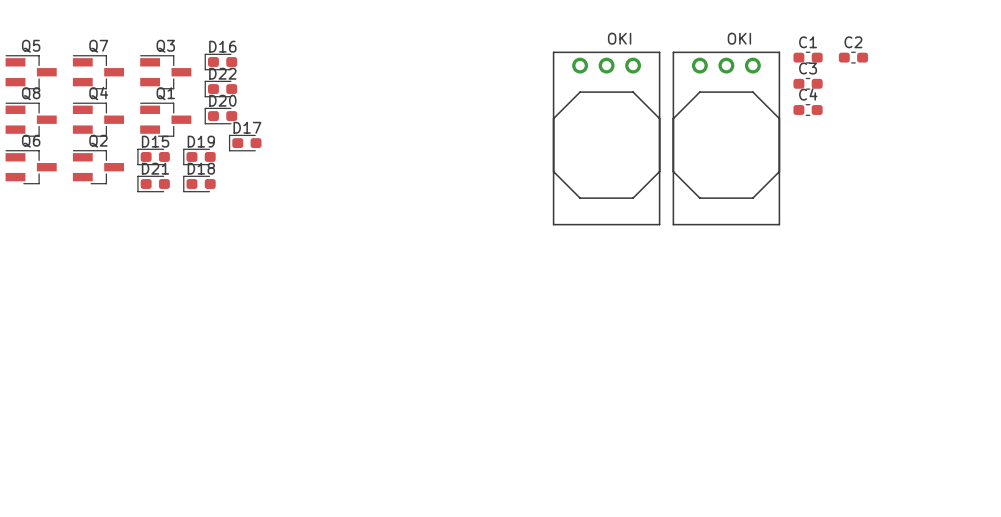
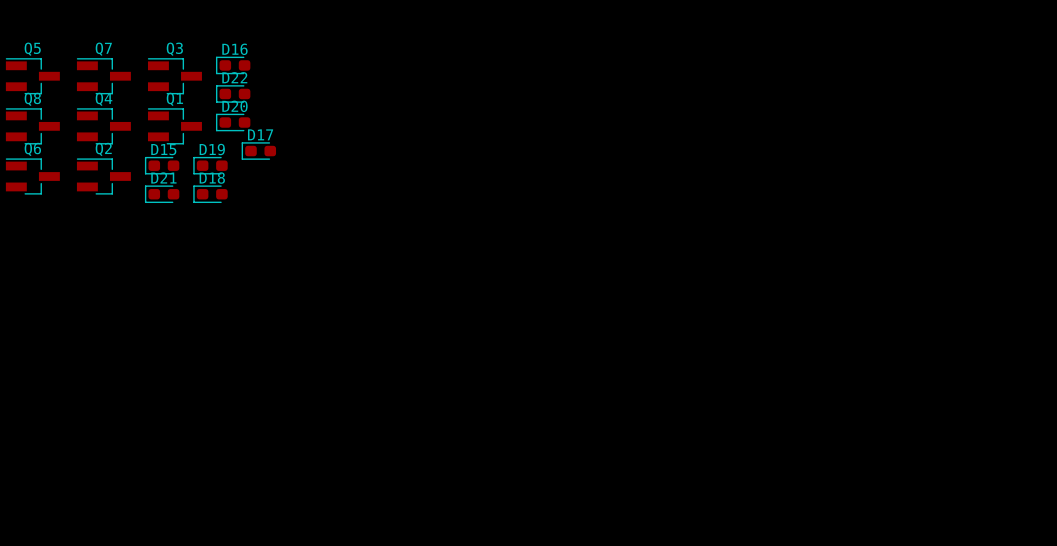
C1: (808, 57) -> none
C2: (853, 57) -> none
C3: (808, 83) -> none
C4: (808, 110) -> none
part: OKI (606, 138) -> none
part: OKI (726, 138) -> none

